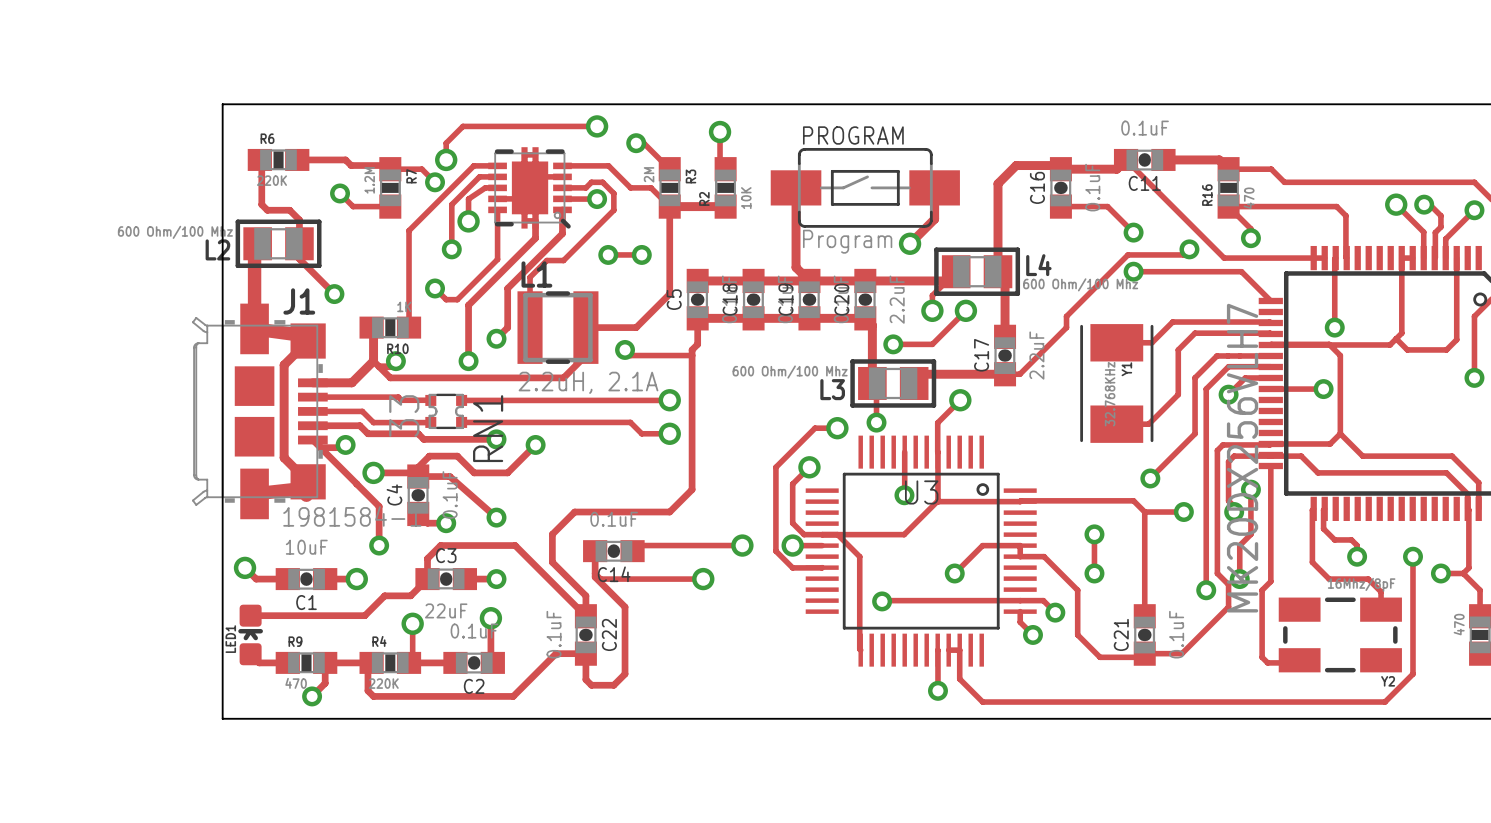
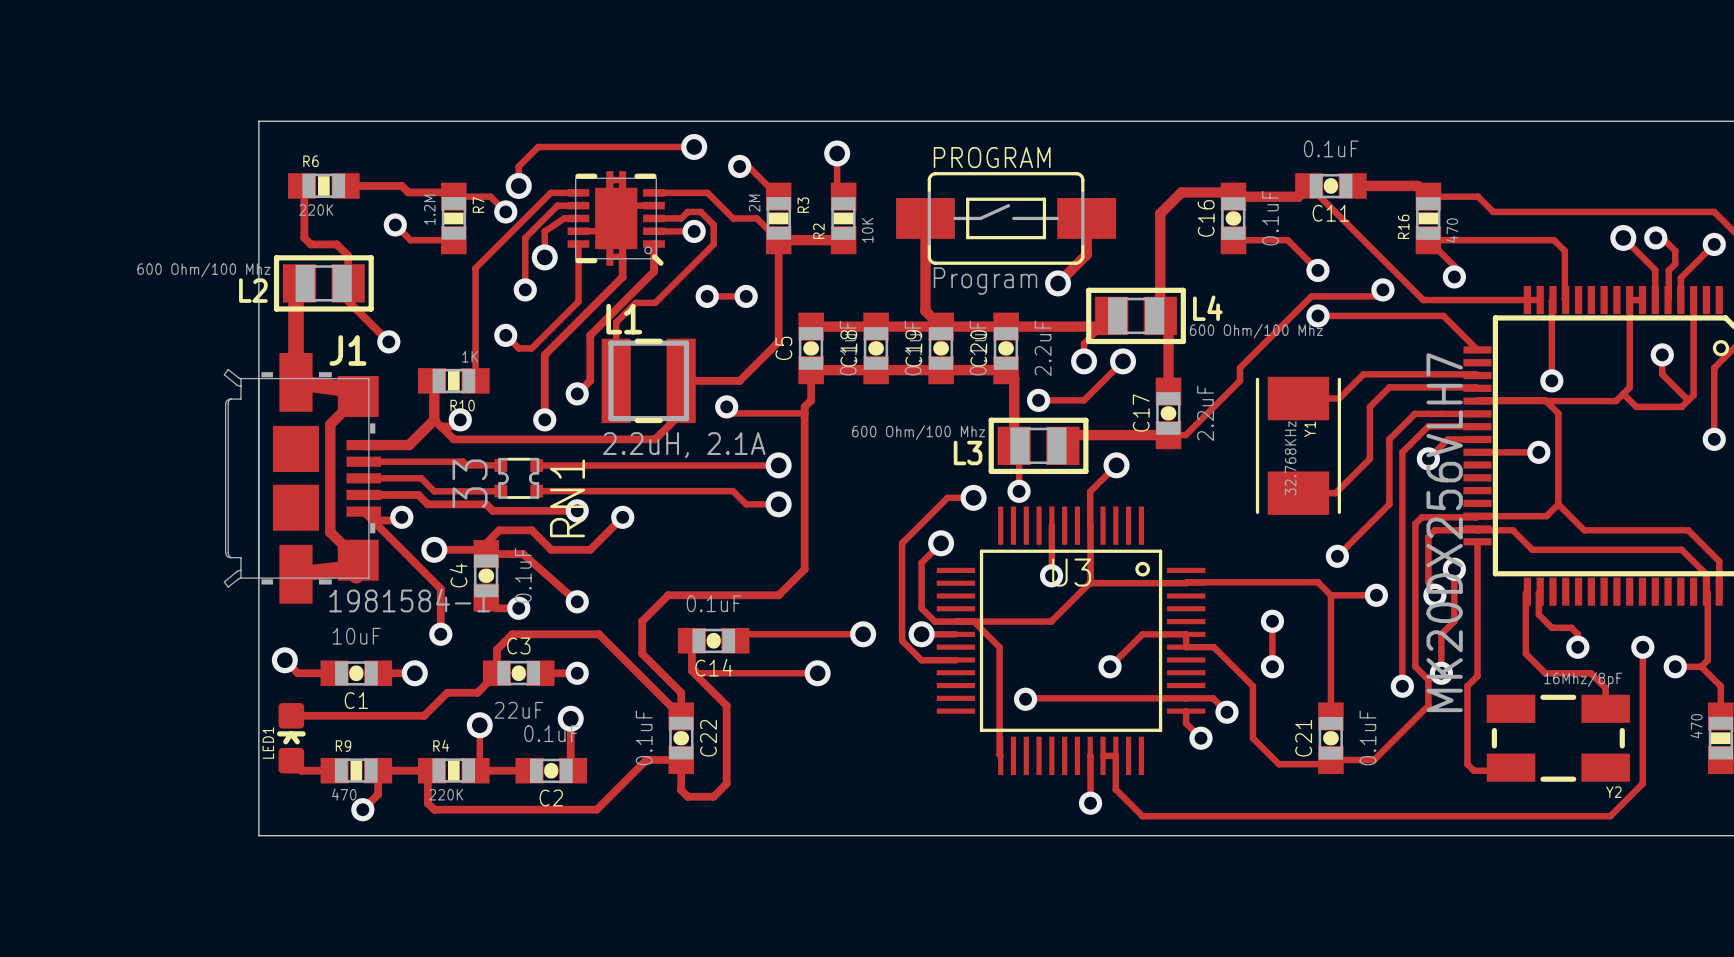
track: none -> (1662, 354) (1662, 374) (1688, 400)
via: none -> (1662, 354)

